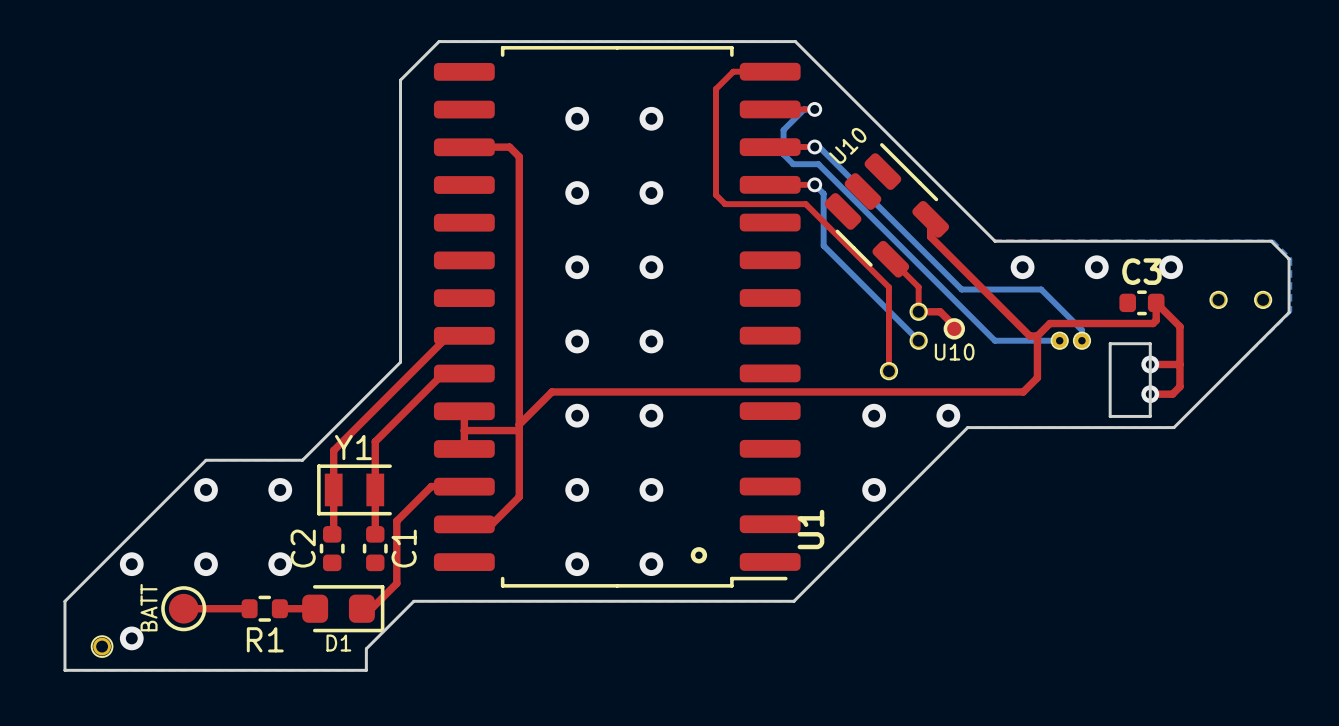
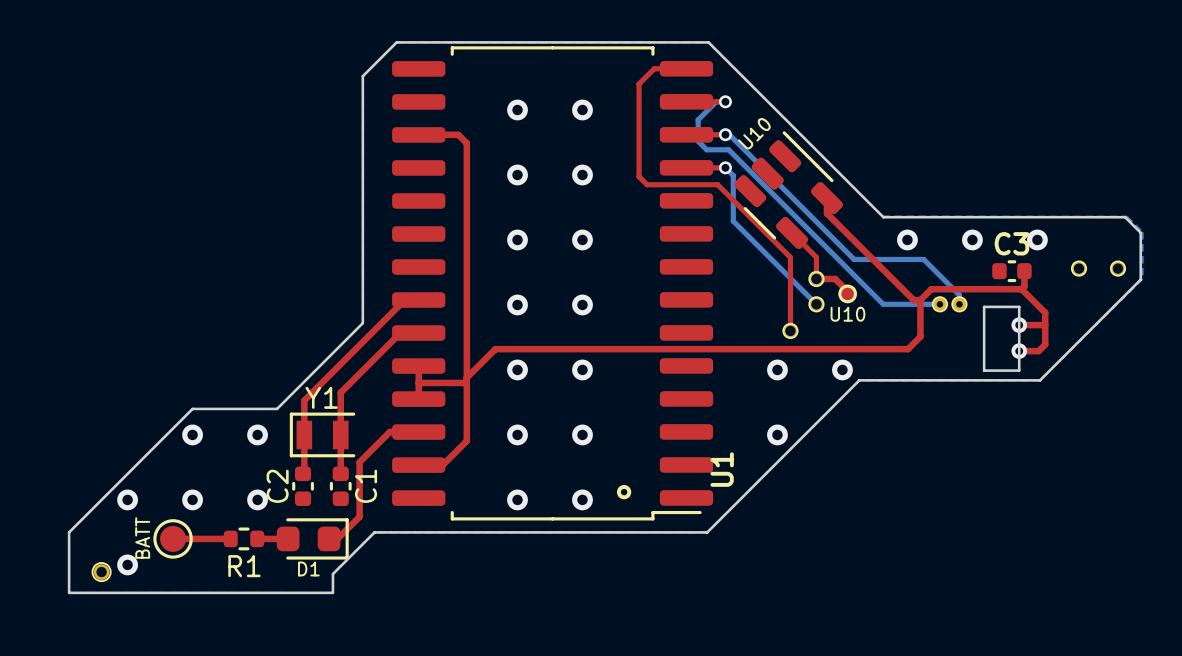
top track: (1156, 302) (1179, 326) (1179, 350) -> (1021, 289) (1045, 312)

